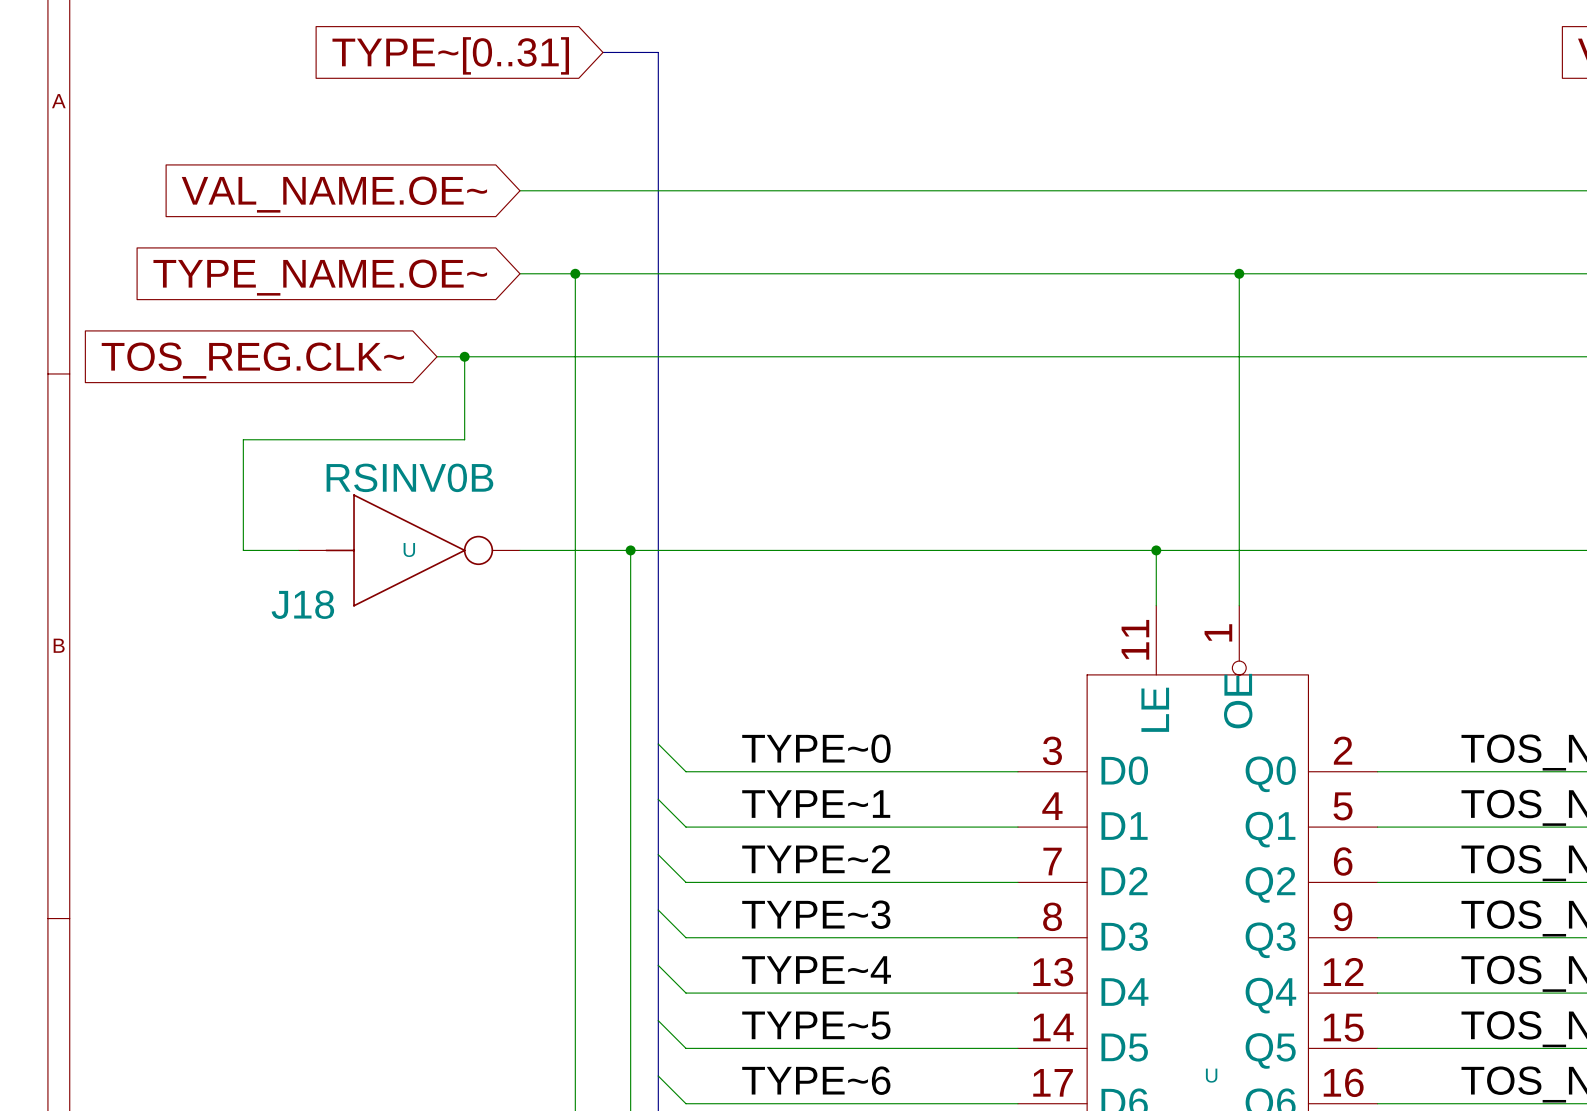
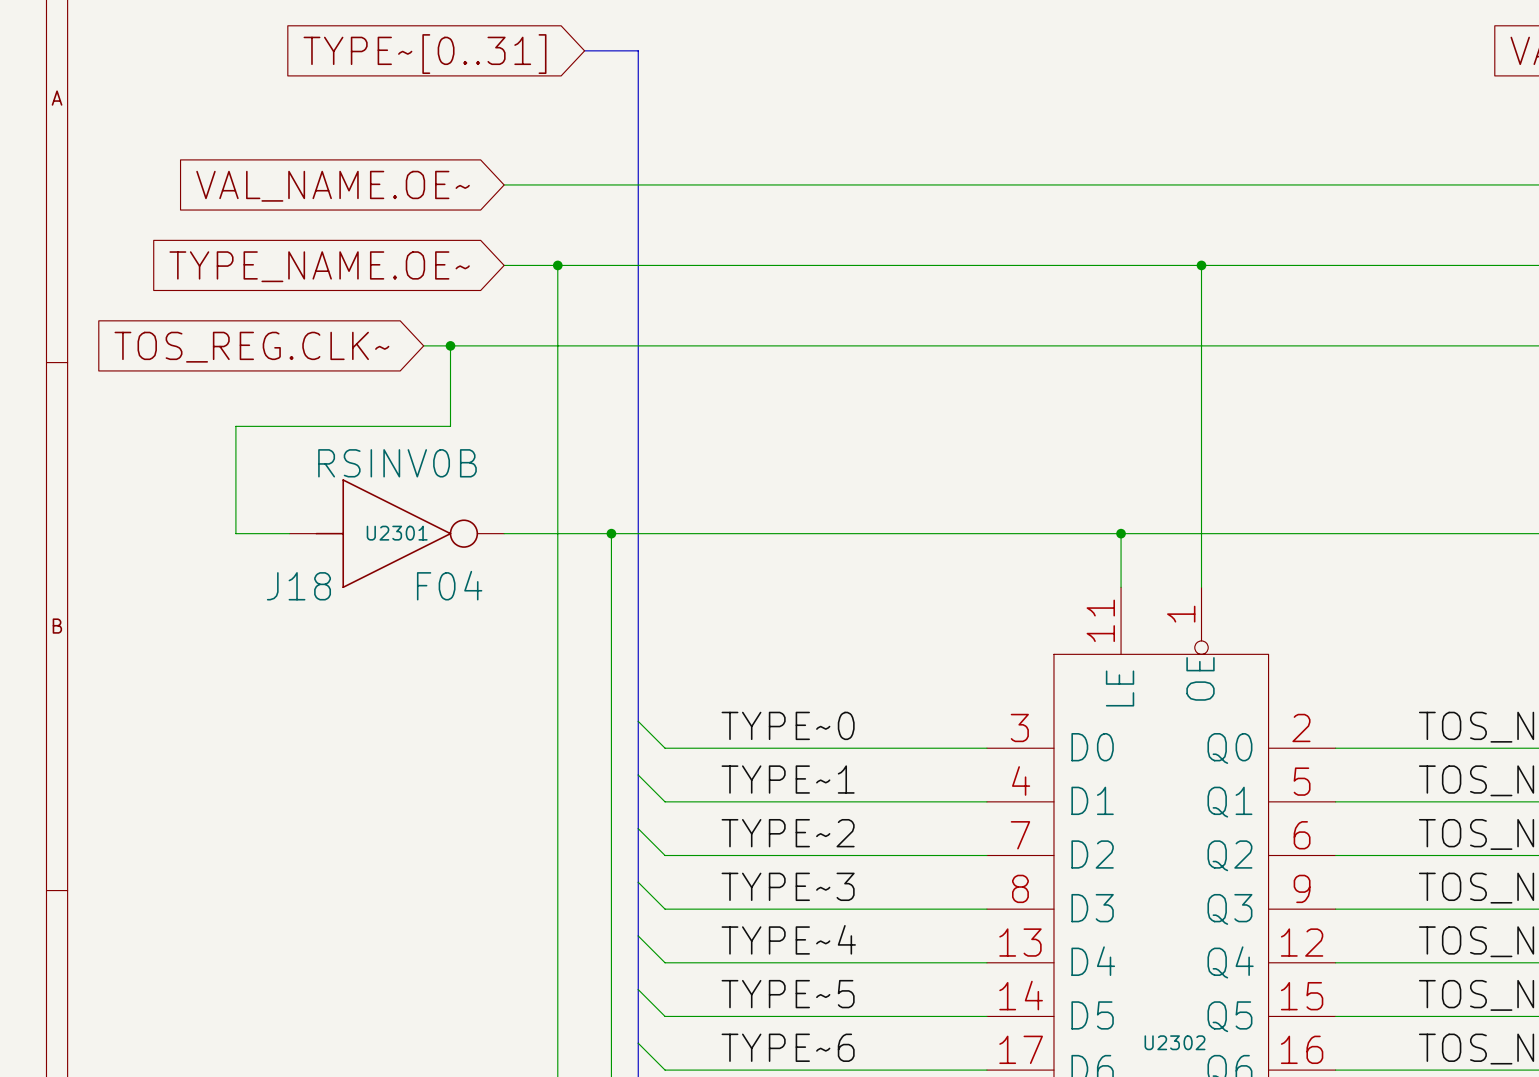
U name: U (409, 550) -> U2301 (397, 533)
U value: none -> F04 (449, 585)
U name: U (1211, 1075) -> U2302 (1175, 1042)

